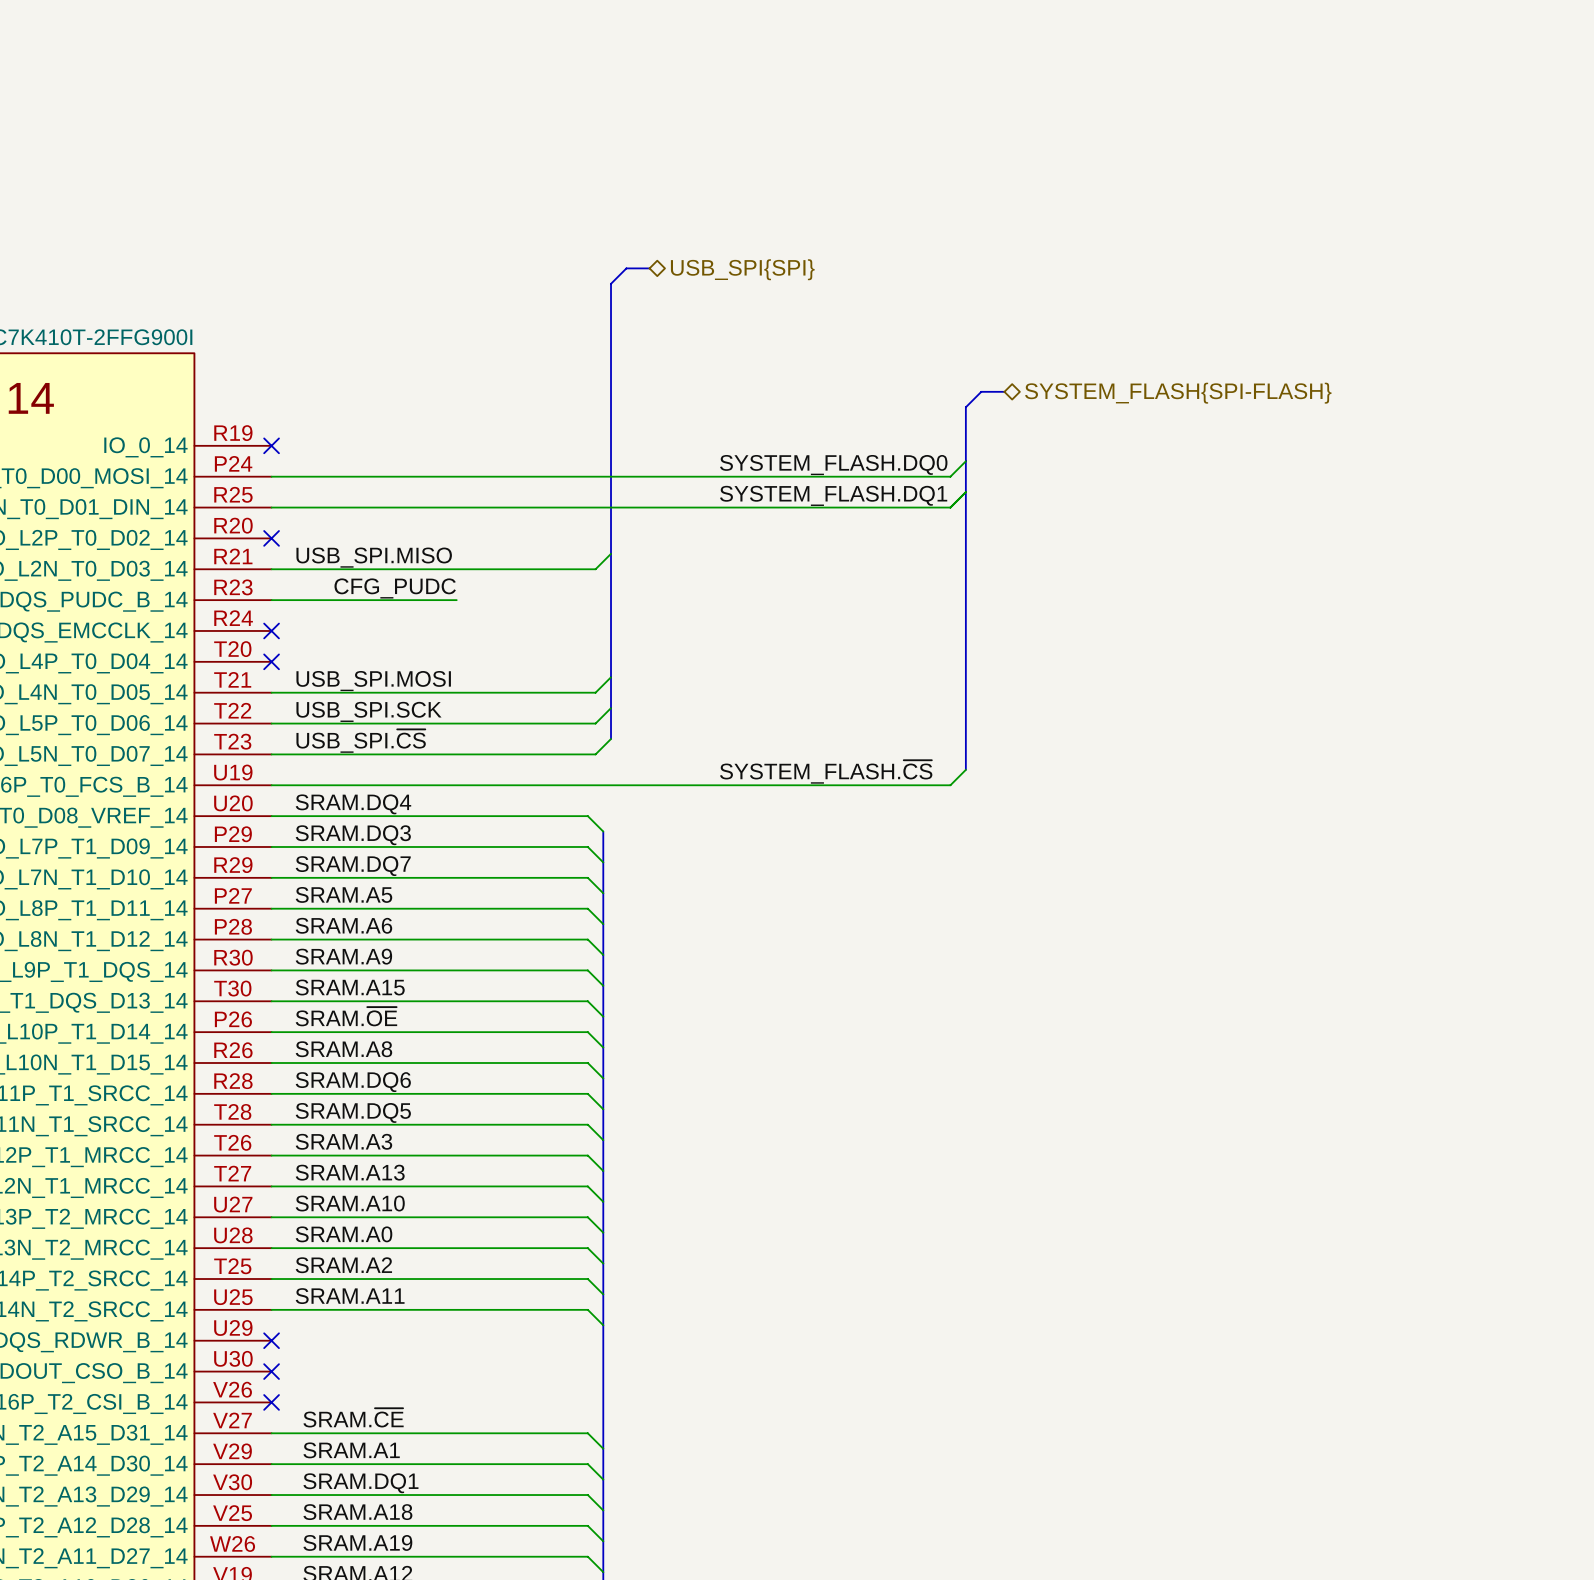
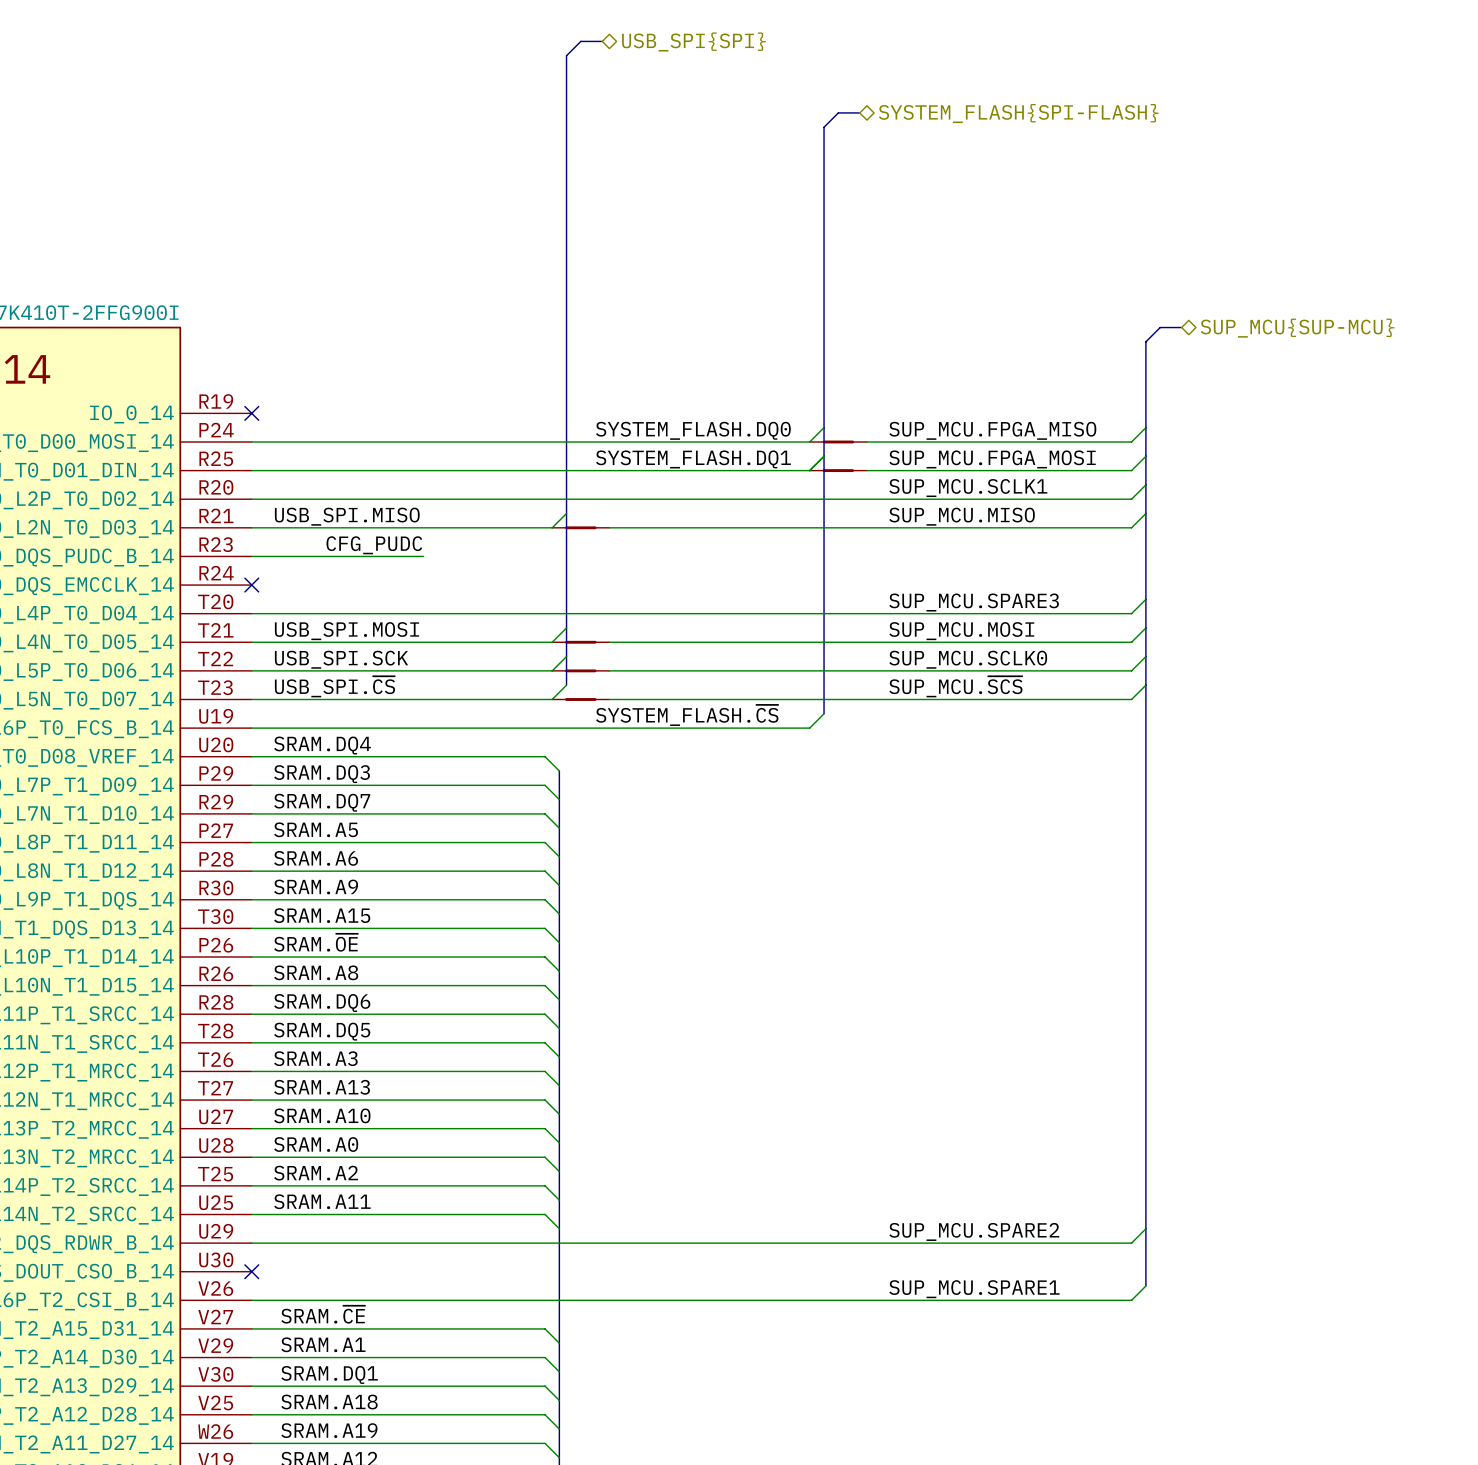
bus: none -> (859, 112) (838, 112) (824, 127) (824, 713)
bus: (649, 268) (626, 268) (611, 283) -> (602, 41) (580, 41) (566, 55) (566, 263)
hierarchical label position: USB_SPI{SPI} (742, 269) -> USB_SPI{SPI} (693, 41)
bus: none -> (1181, 327) (1160, 327) (1145, 341) (1145, 1286)
hierarchical label: none -> SUP_MCU{SUP-MCU} (1297, 328)
bus: (1004, 391) (981, 391) (965, 407) (965, 769) -> none
hierarchical label position: SYSTEM_FLASH{SPI-FLASH} (1178, 393) -> SYSTEM_FLASH{SPI-FLASH} (1018, 113)
wire: (965, 461) (950, 476) -> (1131, 441) (881, 441)
wire: none -> (1145, 427) (1131, 441)
label position: SYSTEM_FLASH.DQ0 (833, 465) -> SYSTEM_FLASH.DQ0 (693, 430)
label: none -> SUP_MCU.FPGA_MISO (992, 430)
part: none -> (838, 441)
wire: (965, 492) (950, 507) -> (1131, 470) (881, 470)
wire: none -> (1145, 456) (1131, 470)
label position: SYSTEM_FLASH.DQ1 (833, 495) -> SYSTEM_FLASH.DQ1 (693, 459)
label: none -> SUP_MCU.FPGA_MOSI (992, 459)
part: none -> (838, 470)
wire: none -> (1145, 484) (1131, 499)
label: none -> SUP_MCU.SCLK1 (968, 488)
wire: none -> (251, 499) (1131, 499)
no-connect mark: (271, 538) -> none
wire: none -> (1145, 513) (1131, 527)
label: none -> SUP_MCU.MISO (962, 516)
part: none -> (580, 527)
wire: none -> (609, 527) (1131, 527)
wire: none -> (1145, 599) (1131, 613)
label: none -> SUP_MCU.SPARE3 (974, 602)
wire: none -> (251, 613) (1131, 613)
no-connect mark: (271, 661) -> none
wire: none -> (1145, 627) (1131, 642)
label: none -> SUP_MCU.MOSI (961, 631)
part: none -> (580, 642)
wire: none -> (609, 642) (1131, 642)
wire: none -> (1145, 656) (1131, 670)
label: none -> SUP_MCU.SCLK0 (968, 659)
part: none -> (580, 670)
wire: none -> (609, 670) (1131, 670)
wire: none -> (1145, 685) (1131, 699)
label: none -> SUP_MCU.~{SCS} (955, 686)
part: none -> (580, 699)
wire: none -> (609, 699) (1131, 699)
wire: (965, 769) (950, 785) (873, 785) -> (824, 713) (809, 728)
label position: SYSTEM_FLASH.~{CS} (826, 771) -> SYSTEM_FLASH.~{CS} (687, 715)
wire: none -> (1145, 1228) (1131, 1243)
label: none -> SUP_MCU.SPARE2 (974, 1231)
wire: none -> (251, 1243) (1131, 1243)
no-connect mark: (271, 1340) -> none
wire: none -> (1145, 1286) (1131, 1300)
label: none -> SUP_MCU.SPARE1 (974, 1289)
wire: none -> (251, 1300) (1131, 1300)
no-connect mark: (271, 1402) -> none

